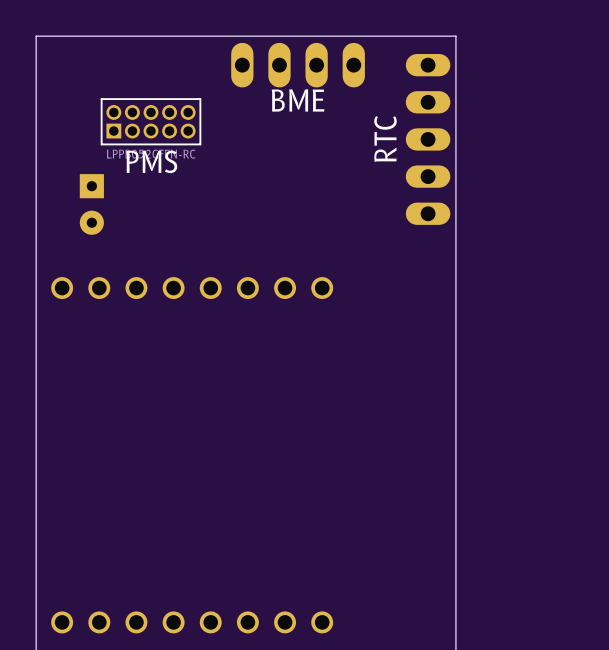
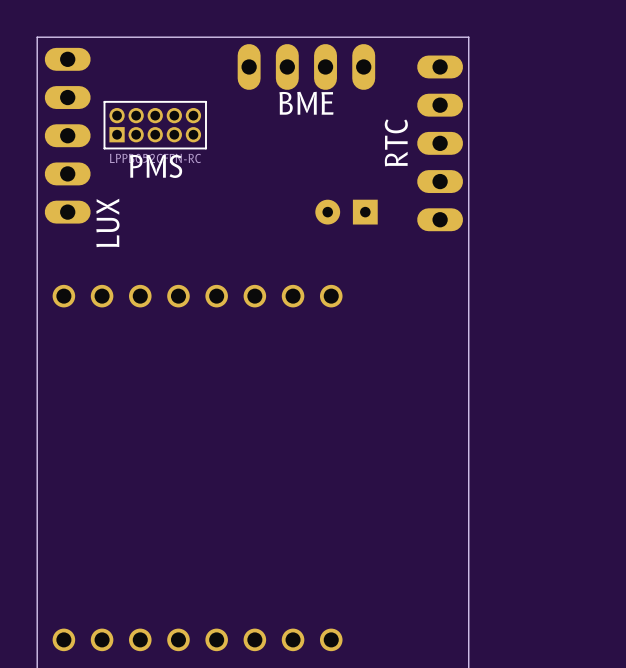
part: none -> (67, 135)
part rotation: 0° (91, 204) -> 90° clockwise (346, 212)
part position: (91, 204) -> (346, 212)
text: none -> LUX (107, 222)

